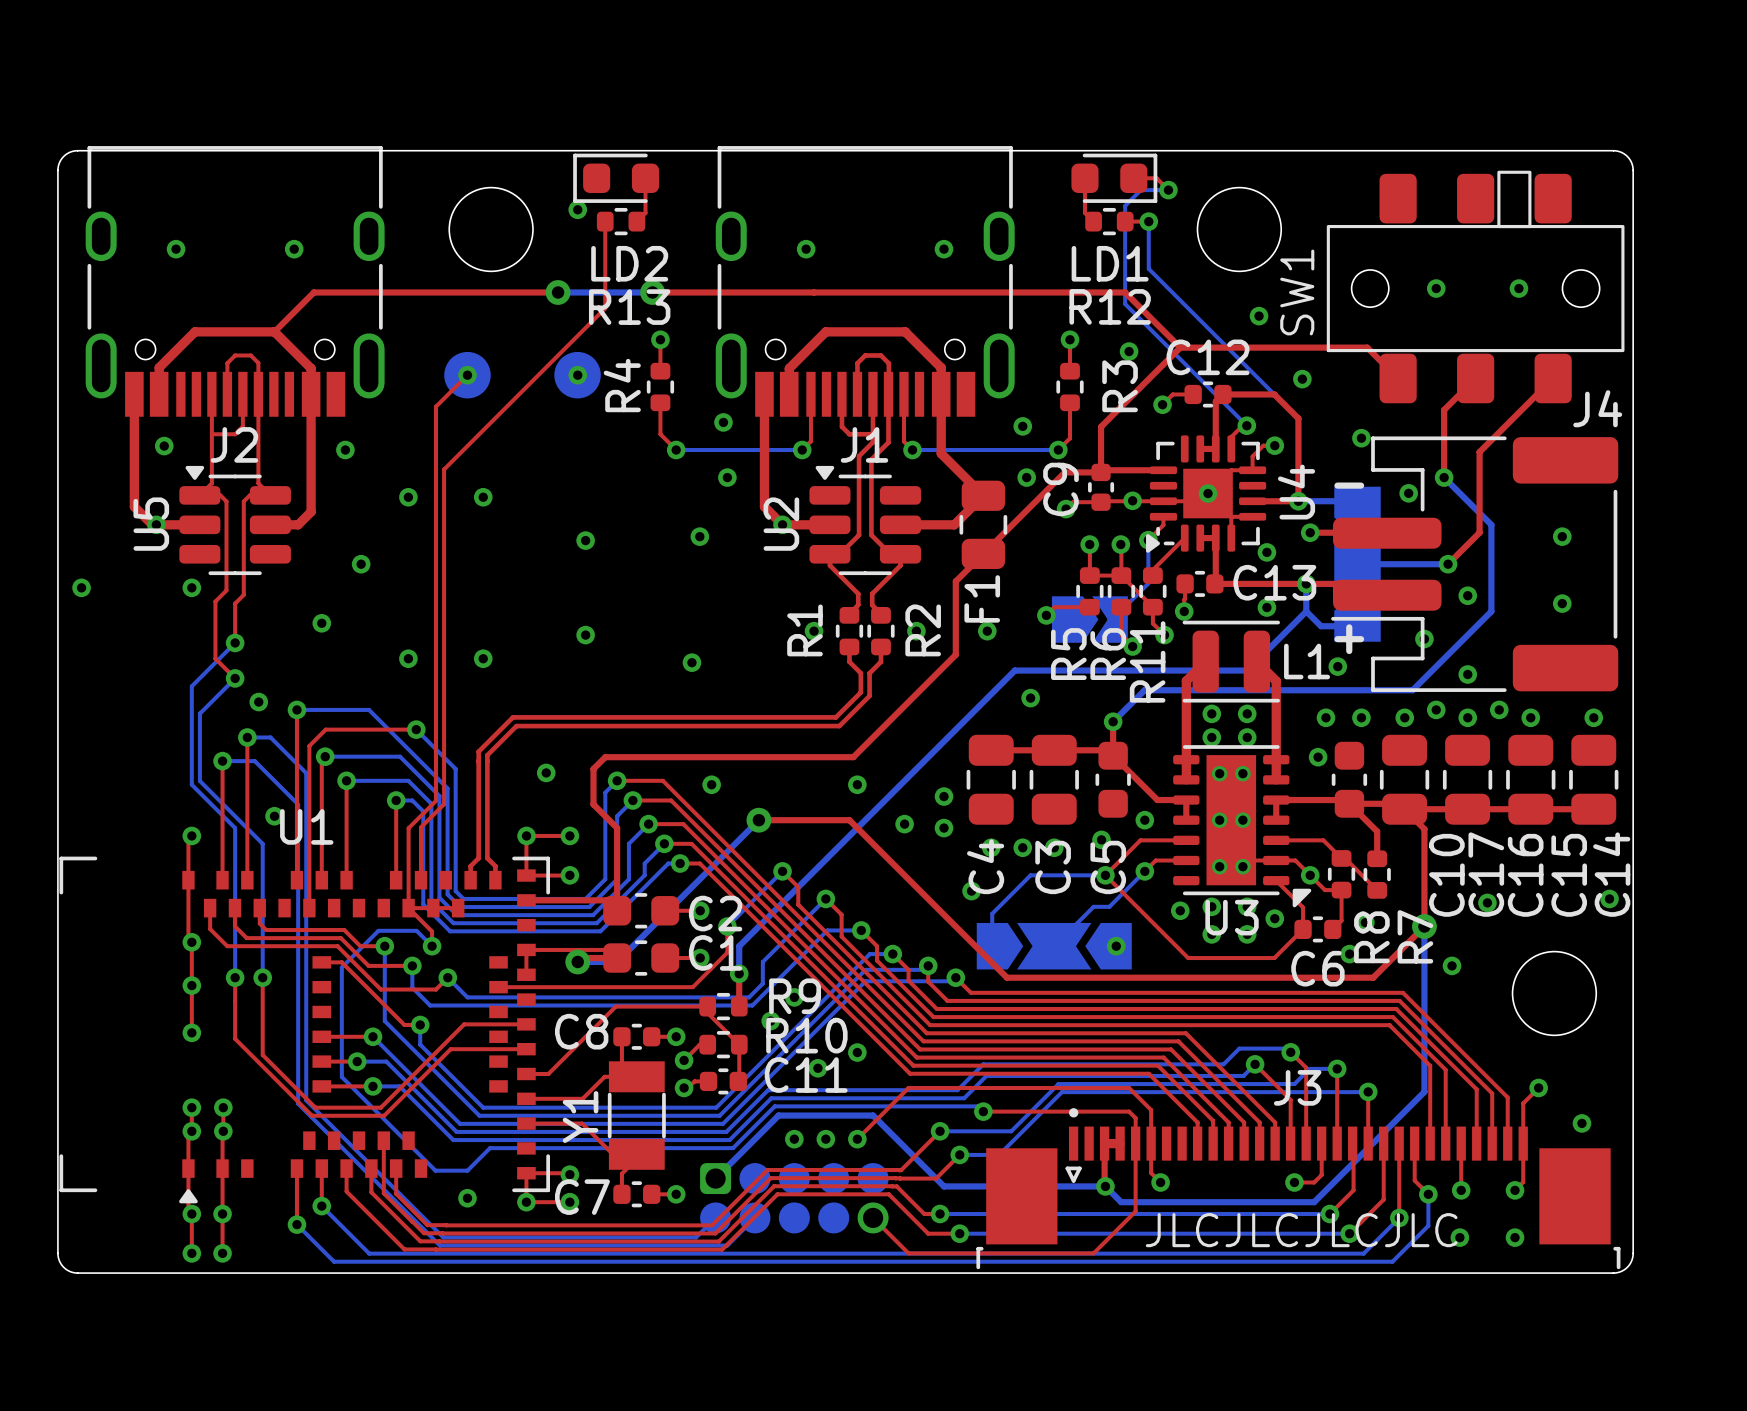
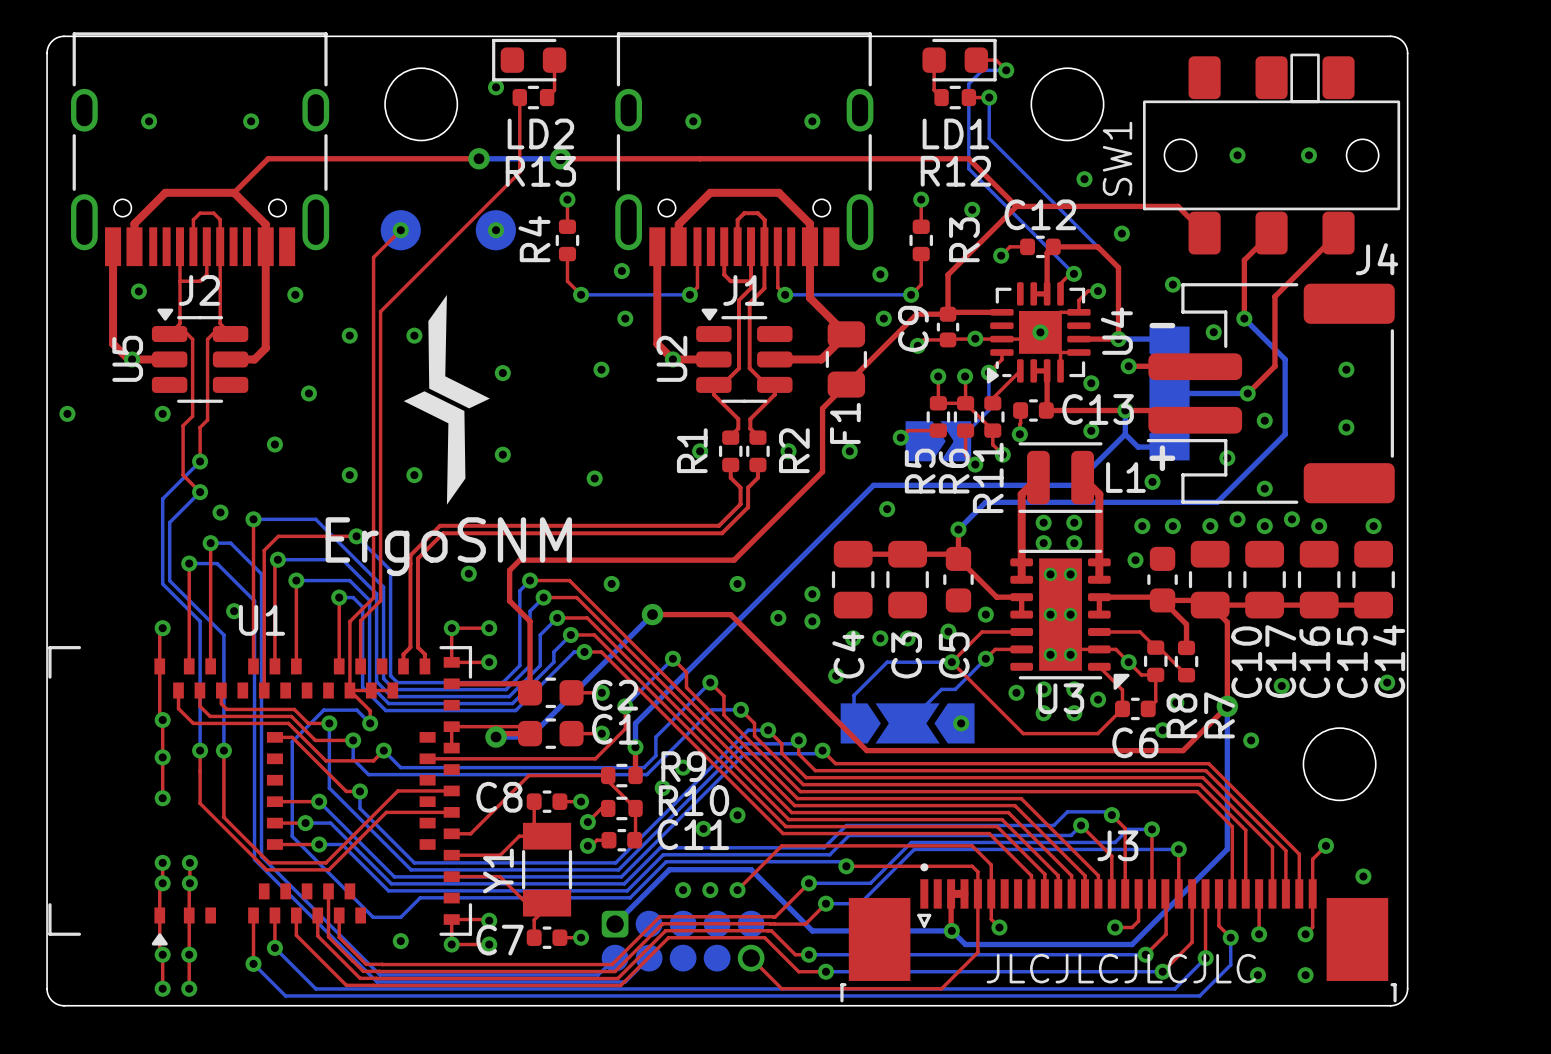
drawing: none -> [403, 294, 490, 505]
text: none -> ErgoSNM (448, 546)

